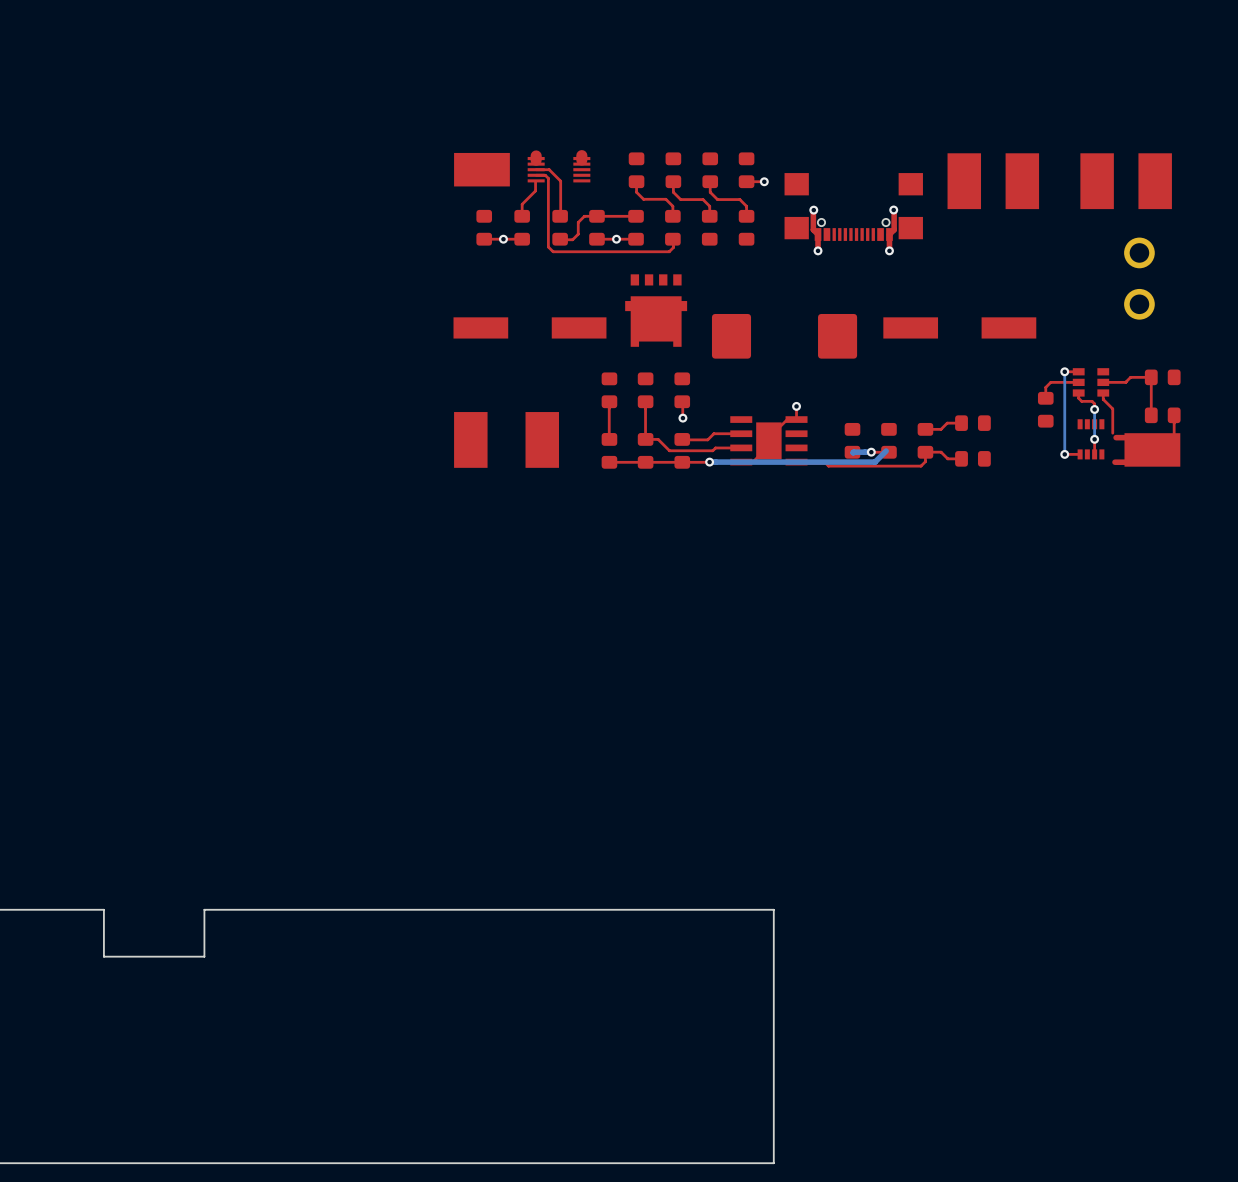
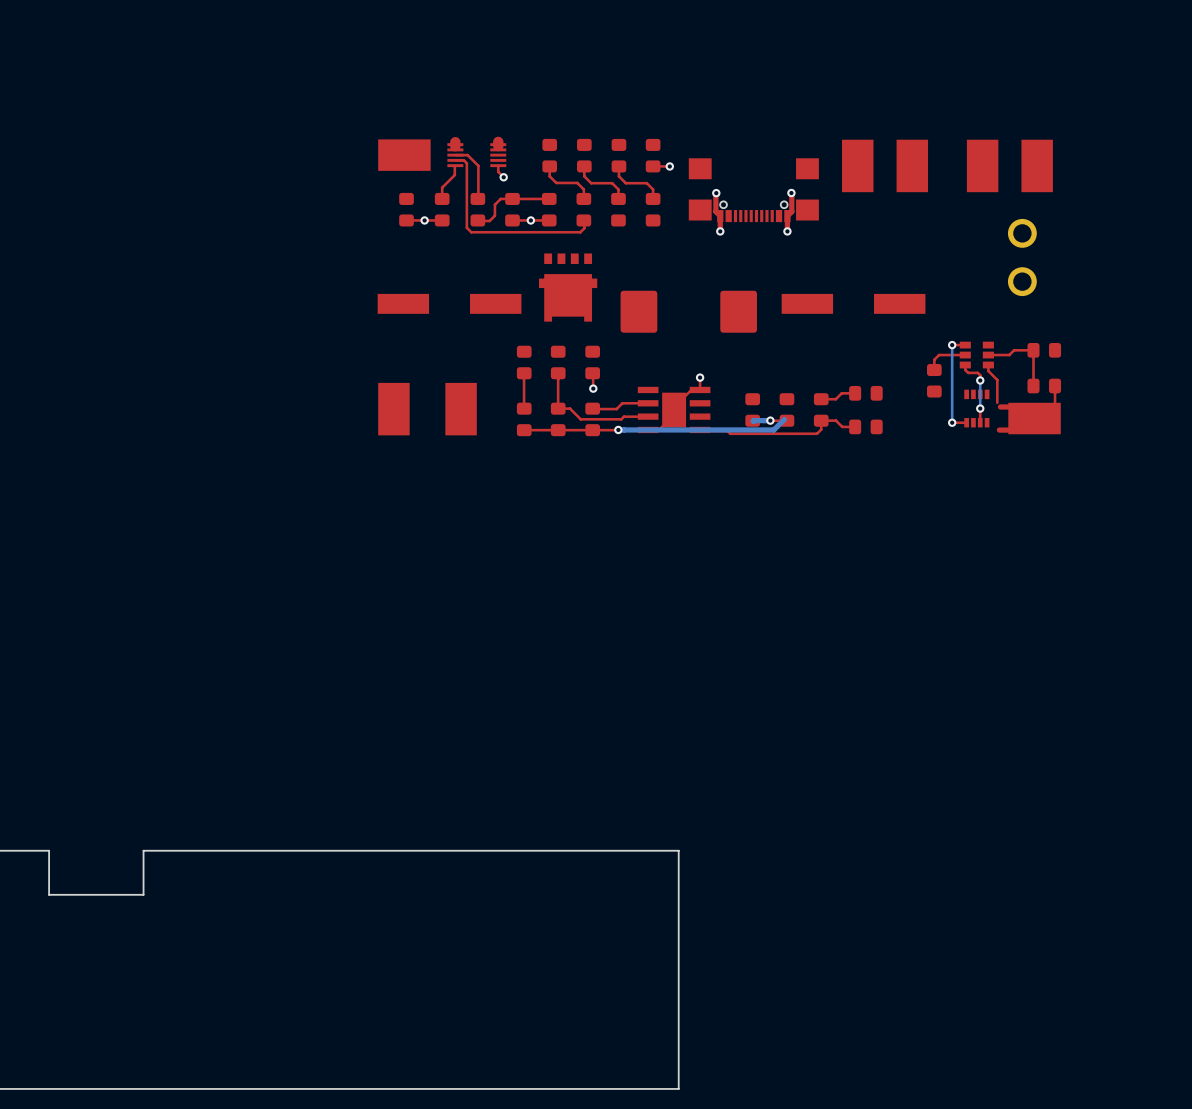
top track: none -> (498, 165) (498, 171) (503, 177)
via: none -> (503, 177)

